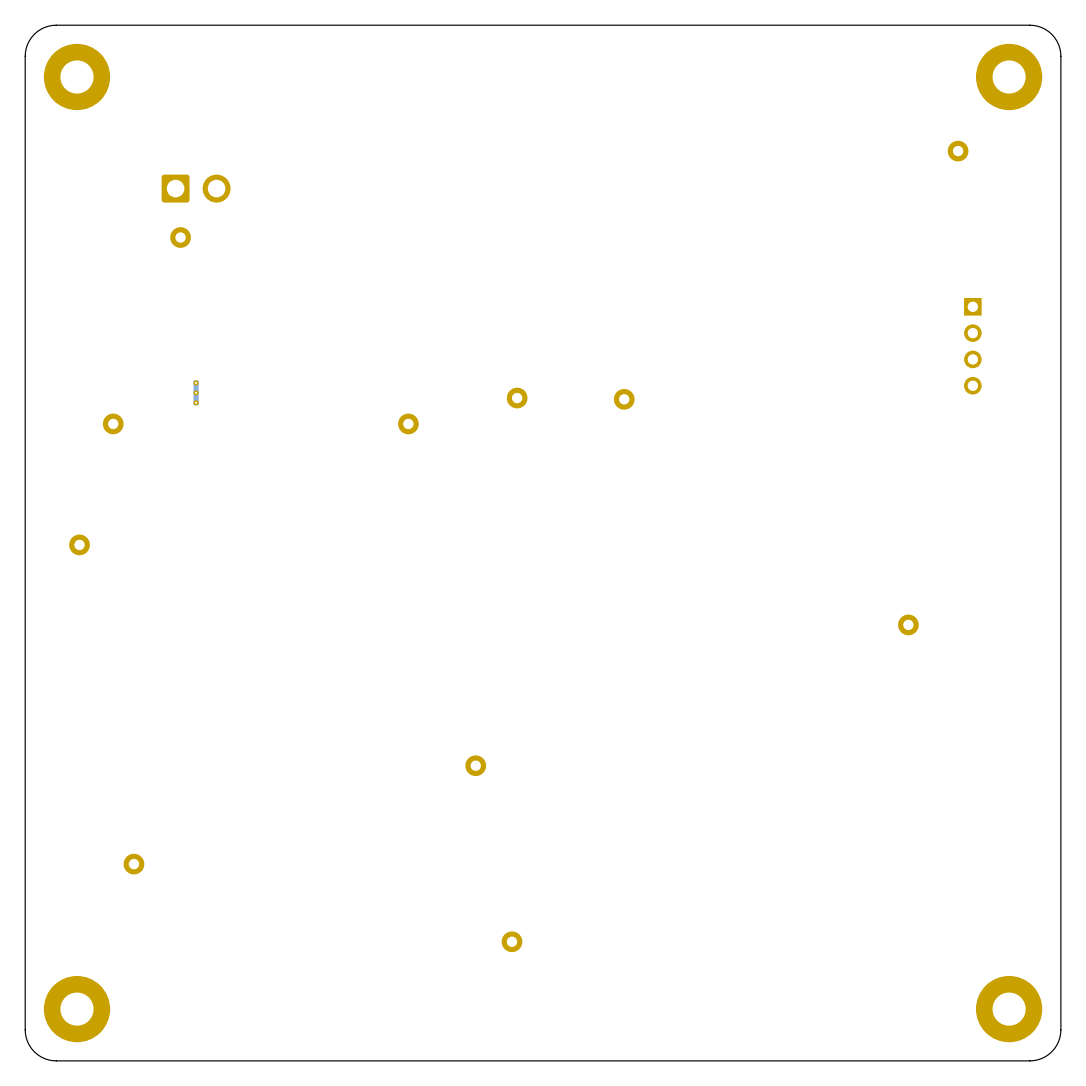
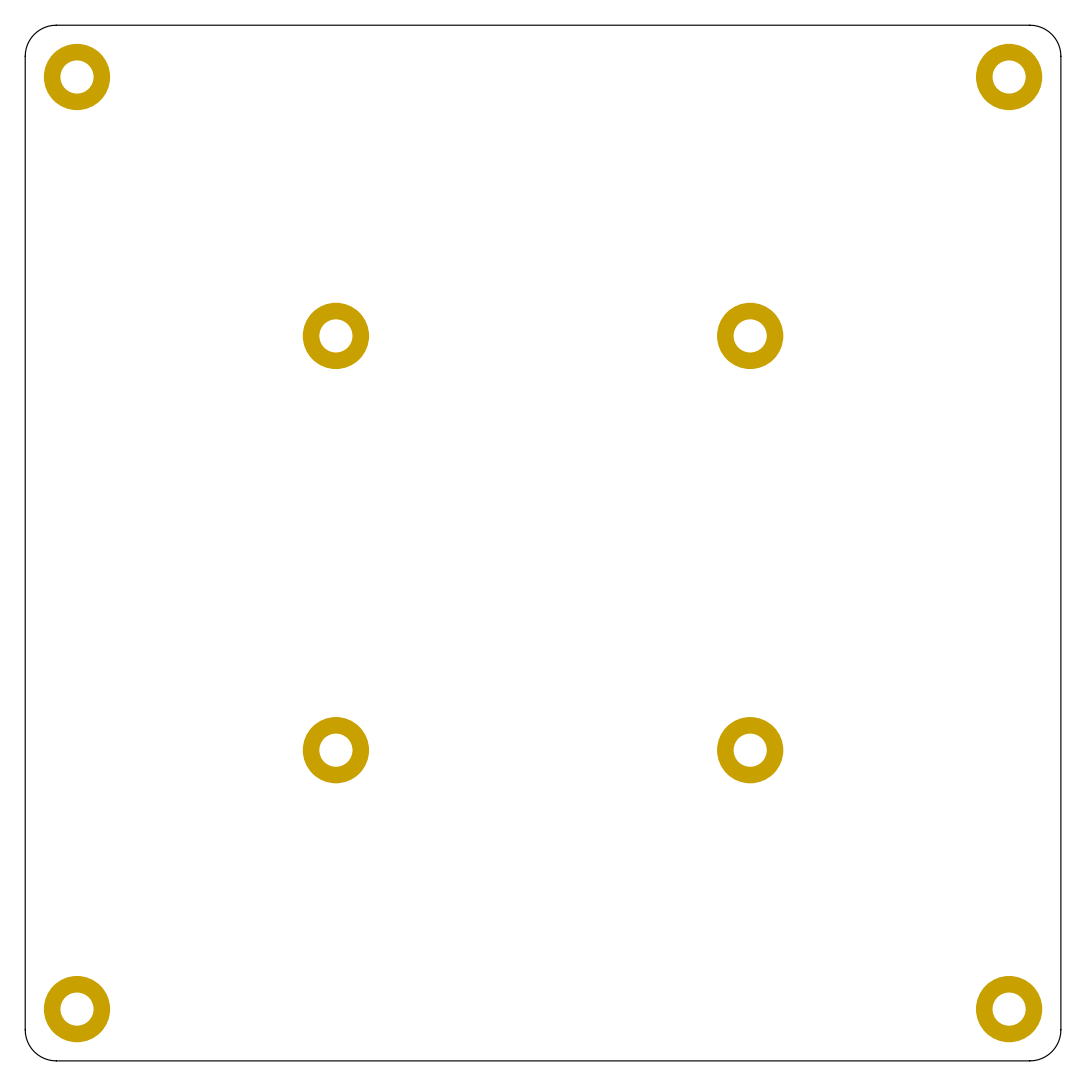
part: (958, 151) -> none
part: (196, 188) -> none
part: (180, 237) -> none
part: none -> (335, 335)
part: none -> (750, 335)
part: (972, 346) -> none
part: (196, 392) -> none
part: (517, 398) -> none
part: (624, 399) -> none
part: (113, 423) -> none
part: (408, 423) -> none
part: (79, 544) -> none
part: (908, 624) -> none
part: none -> (335, 750)
part: none -> (750, 750)
part: (475, 765) -> none
part: (133, 864) -> none
part: (511, 941) -> none

